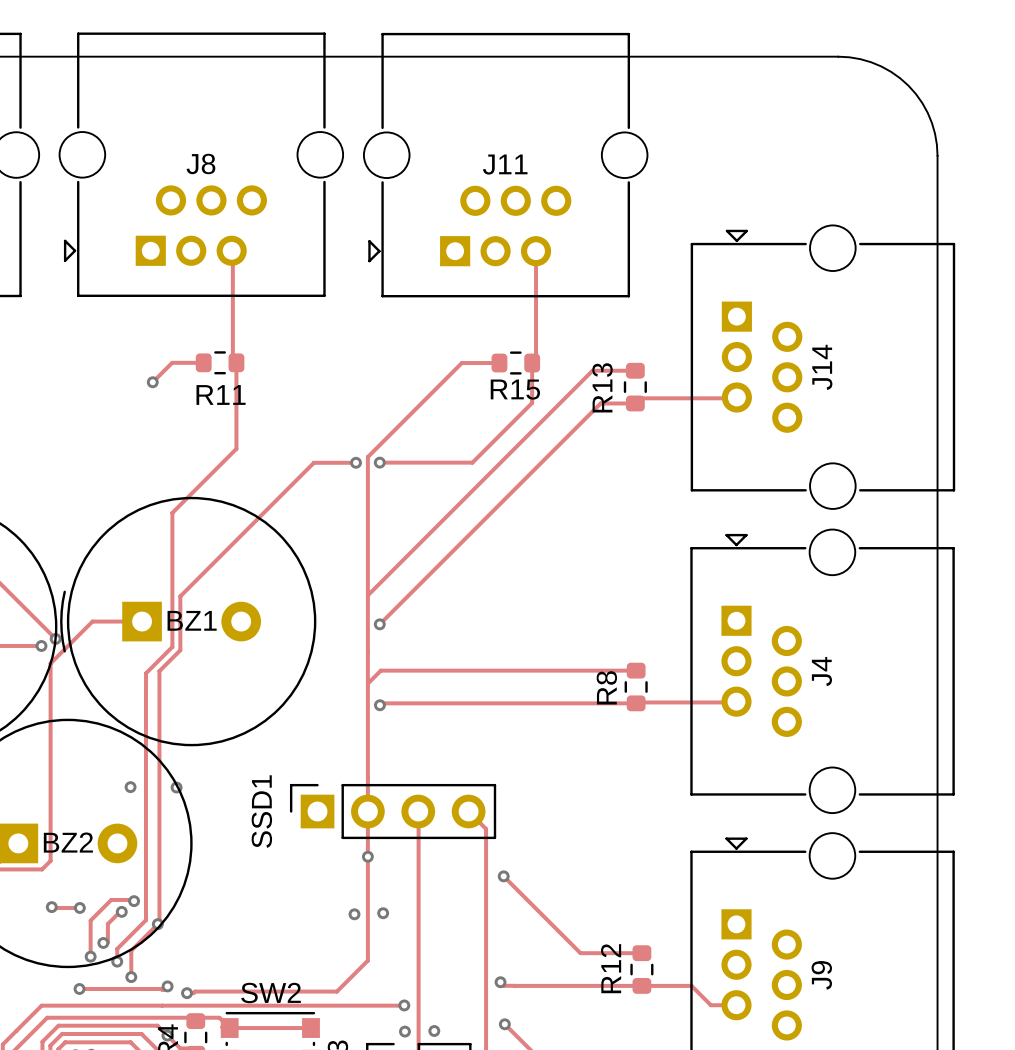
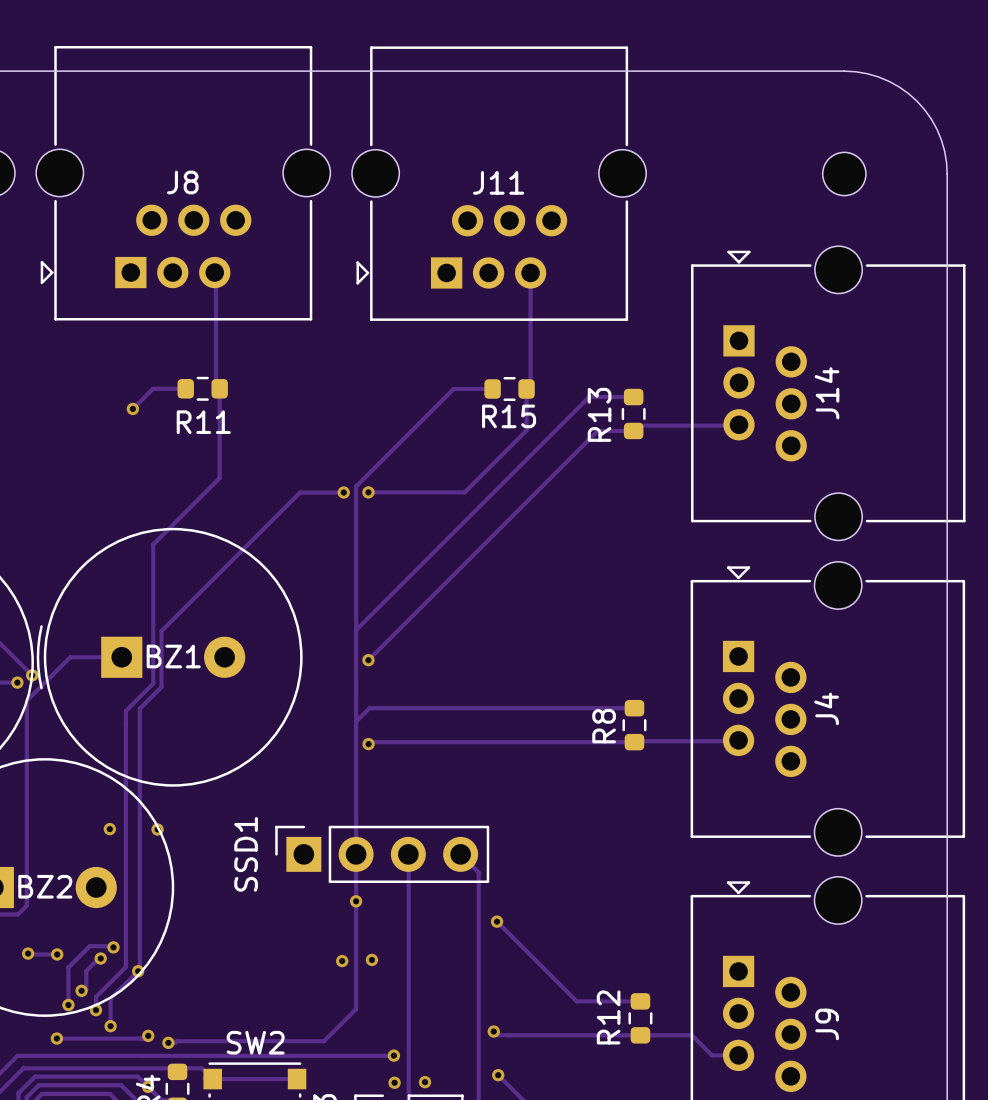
part: none -> (844, 173)

